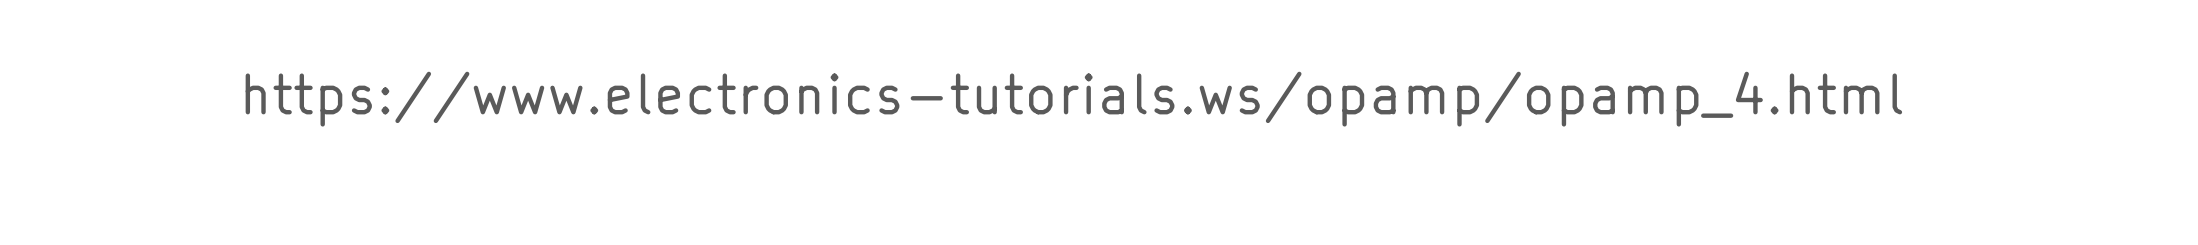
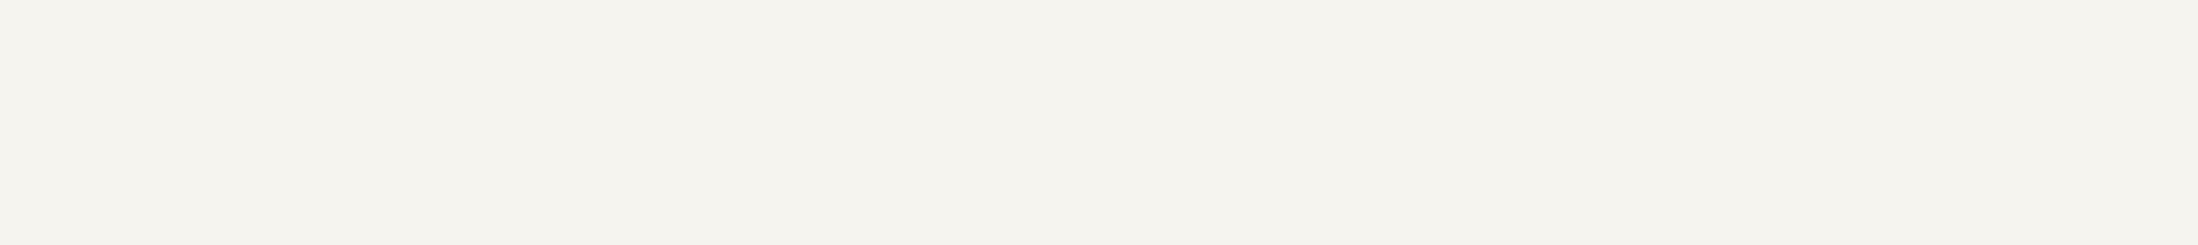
text: https://www.electronics-tutorials.ws/opamp/opamp_4.html (1073, 99) -> none

